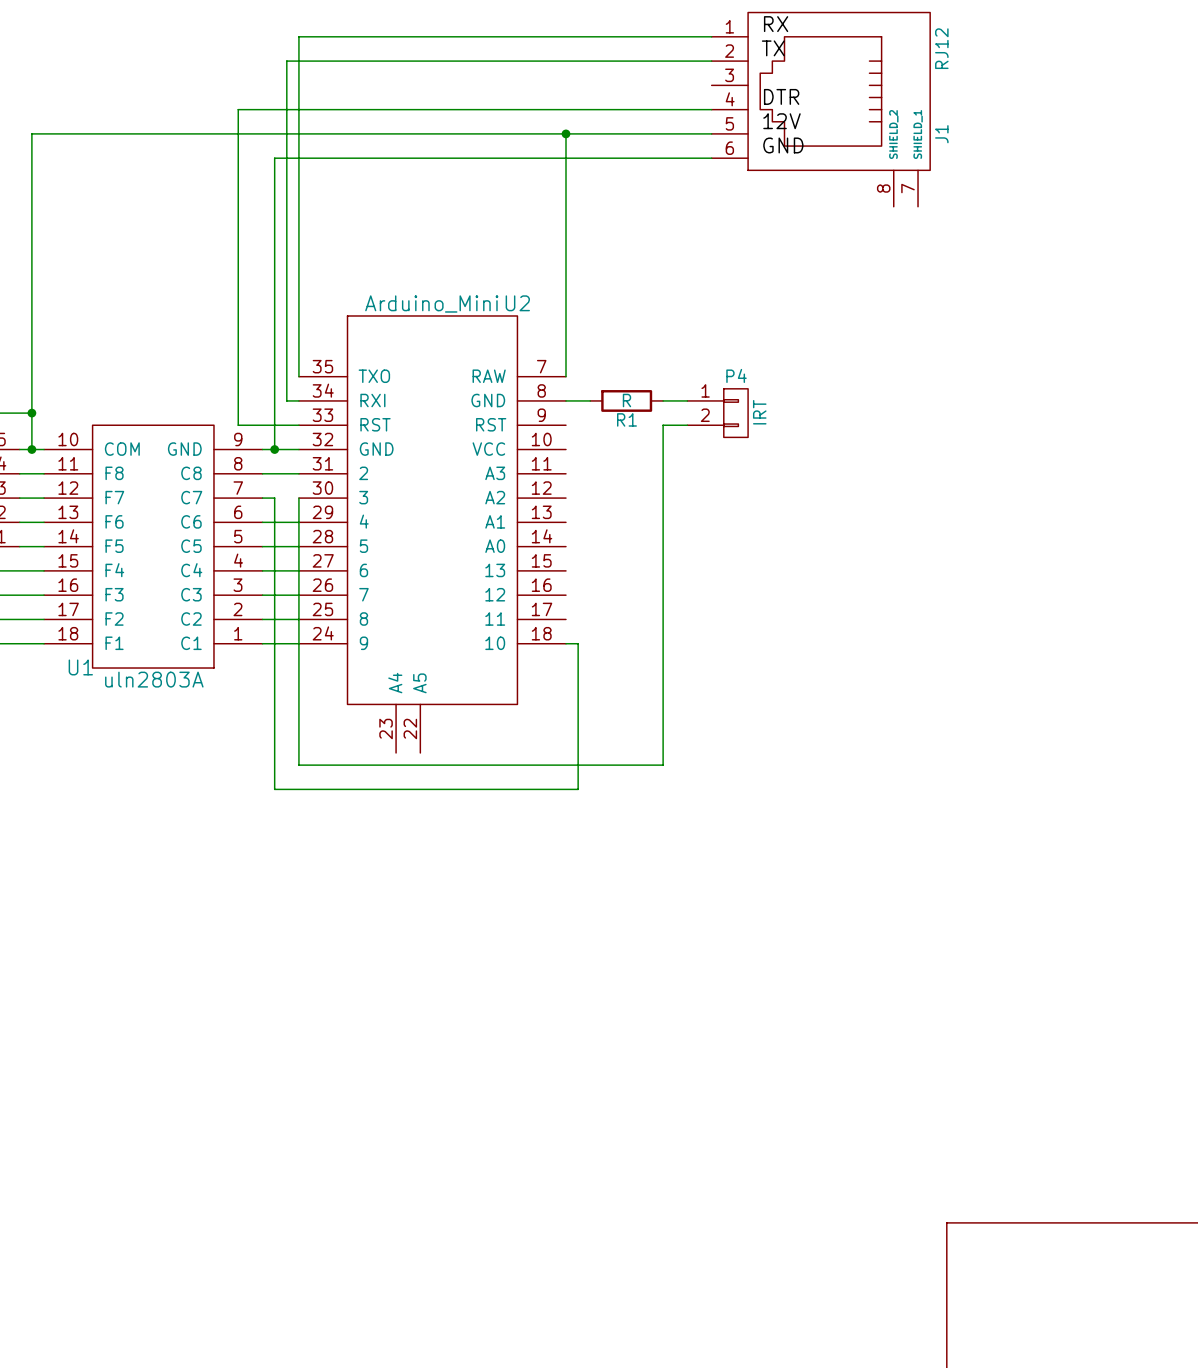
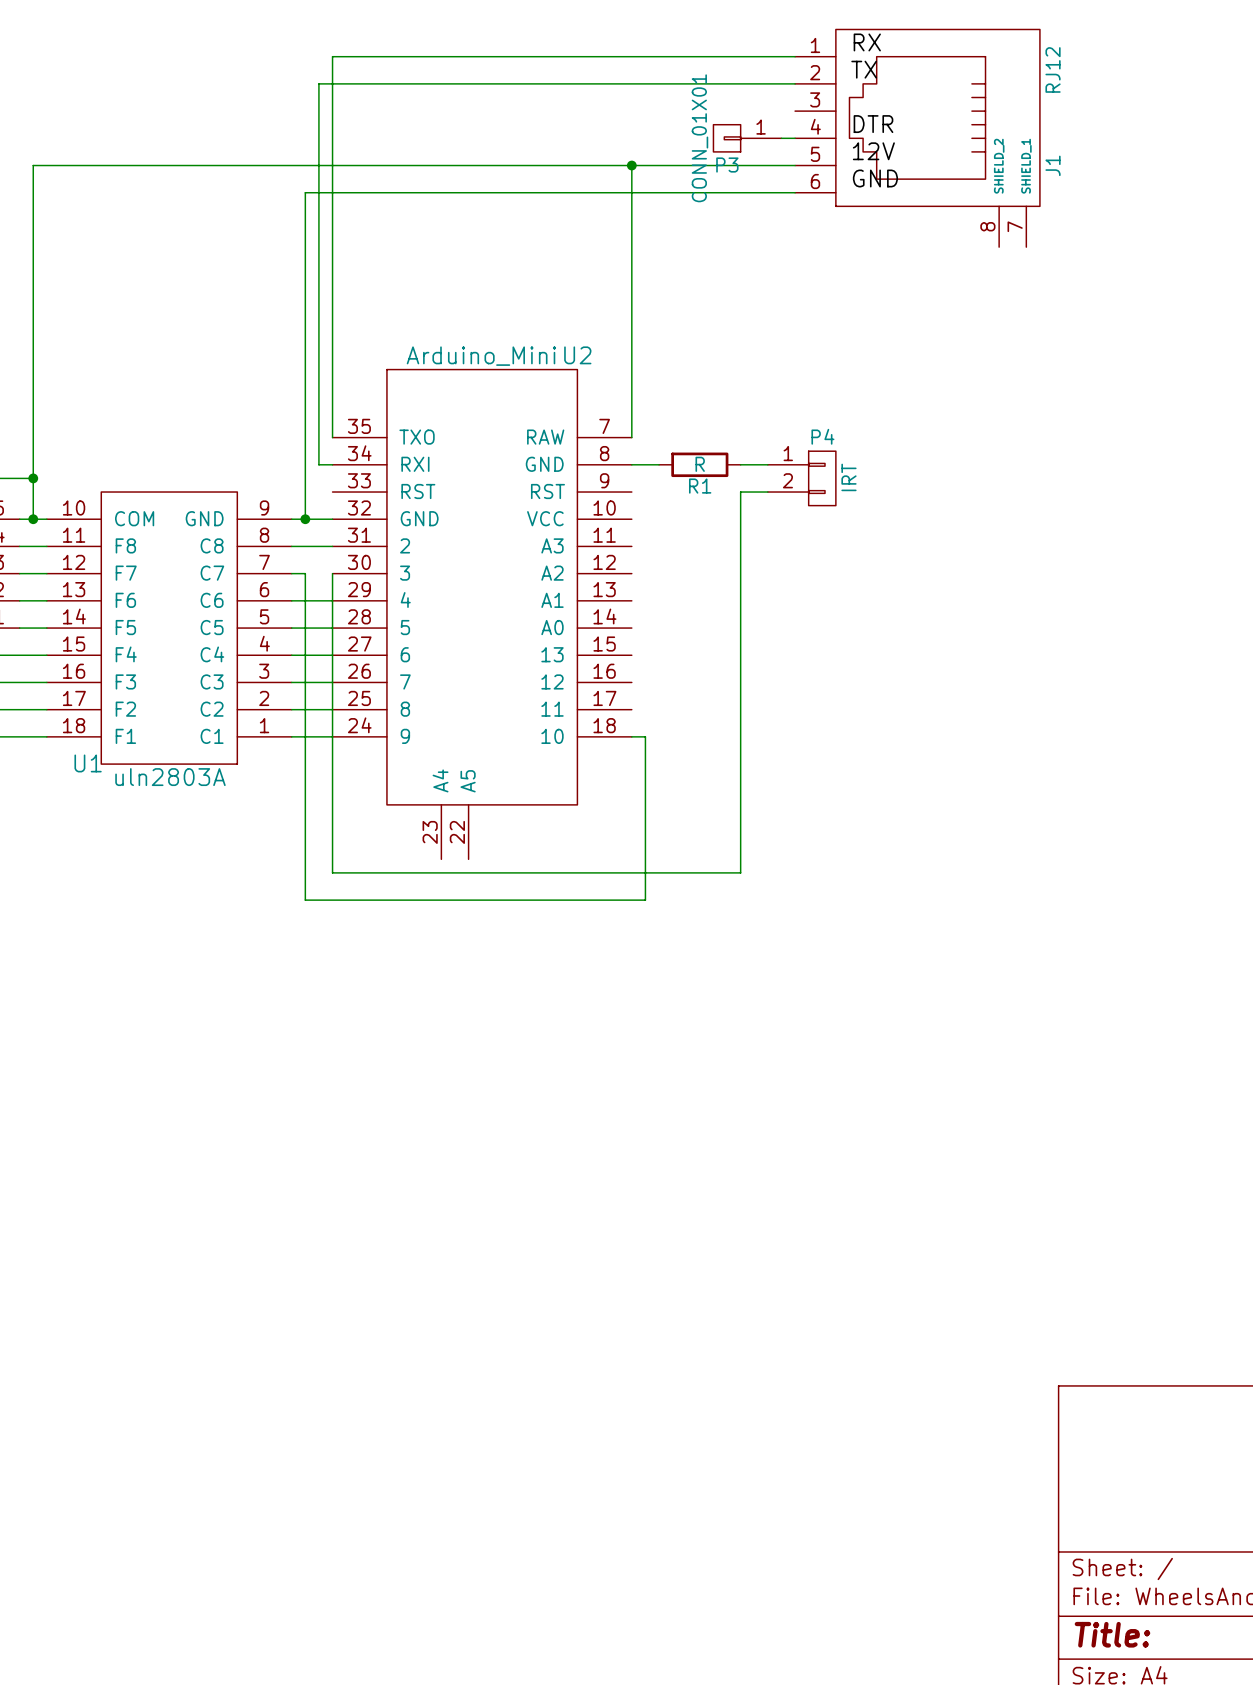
P3: none -> CONN_01X01 (747, 138)
wire: (699, 109) (238, 109) (238, 425) (298, 425) -> none

